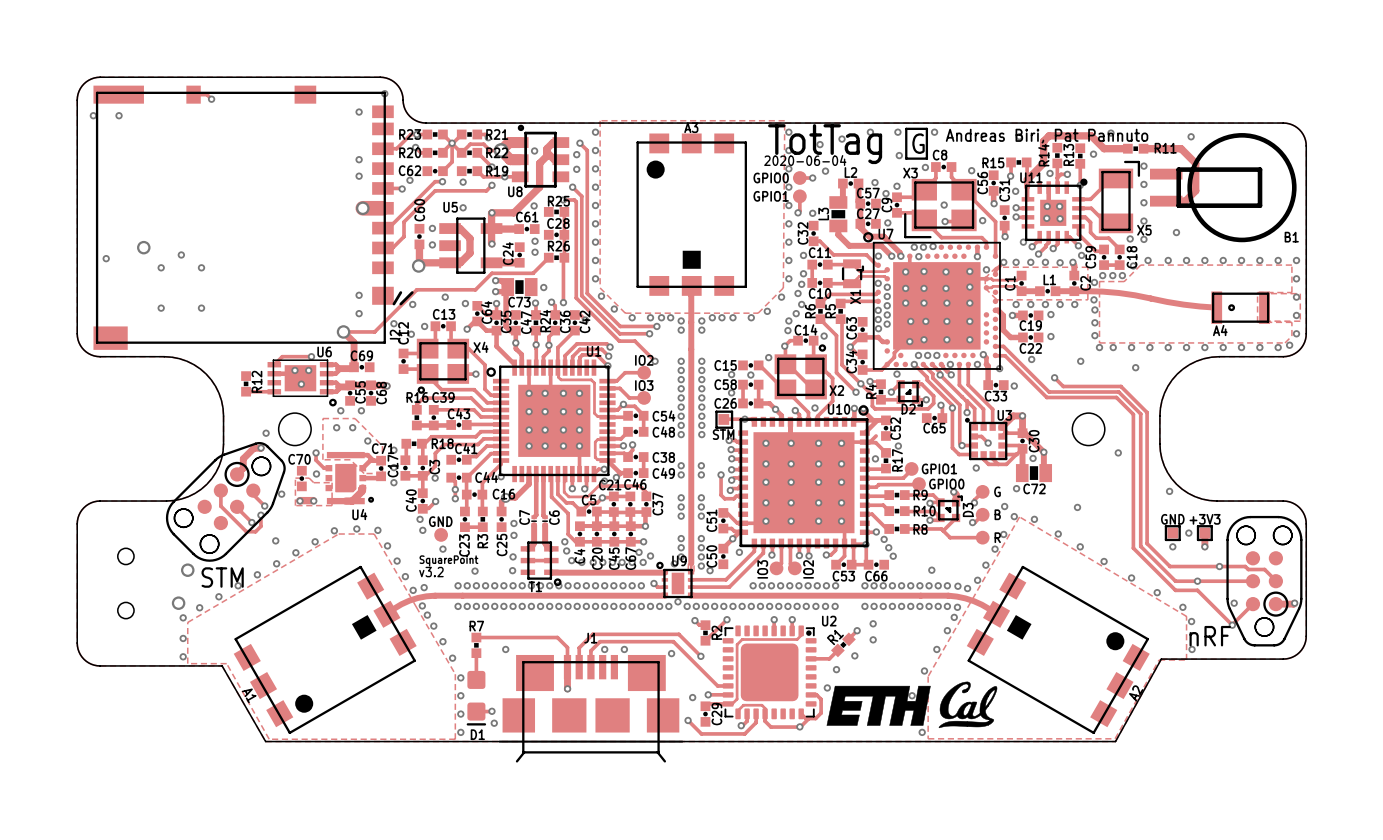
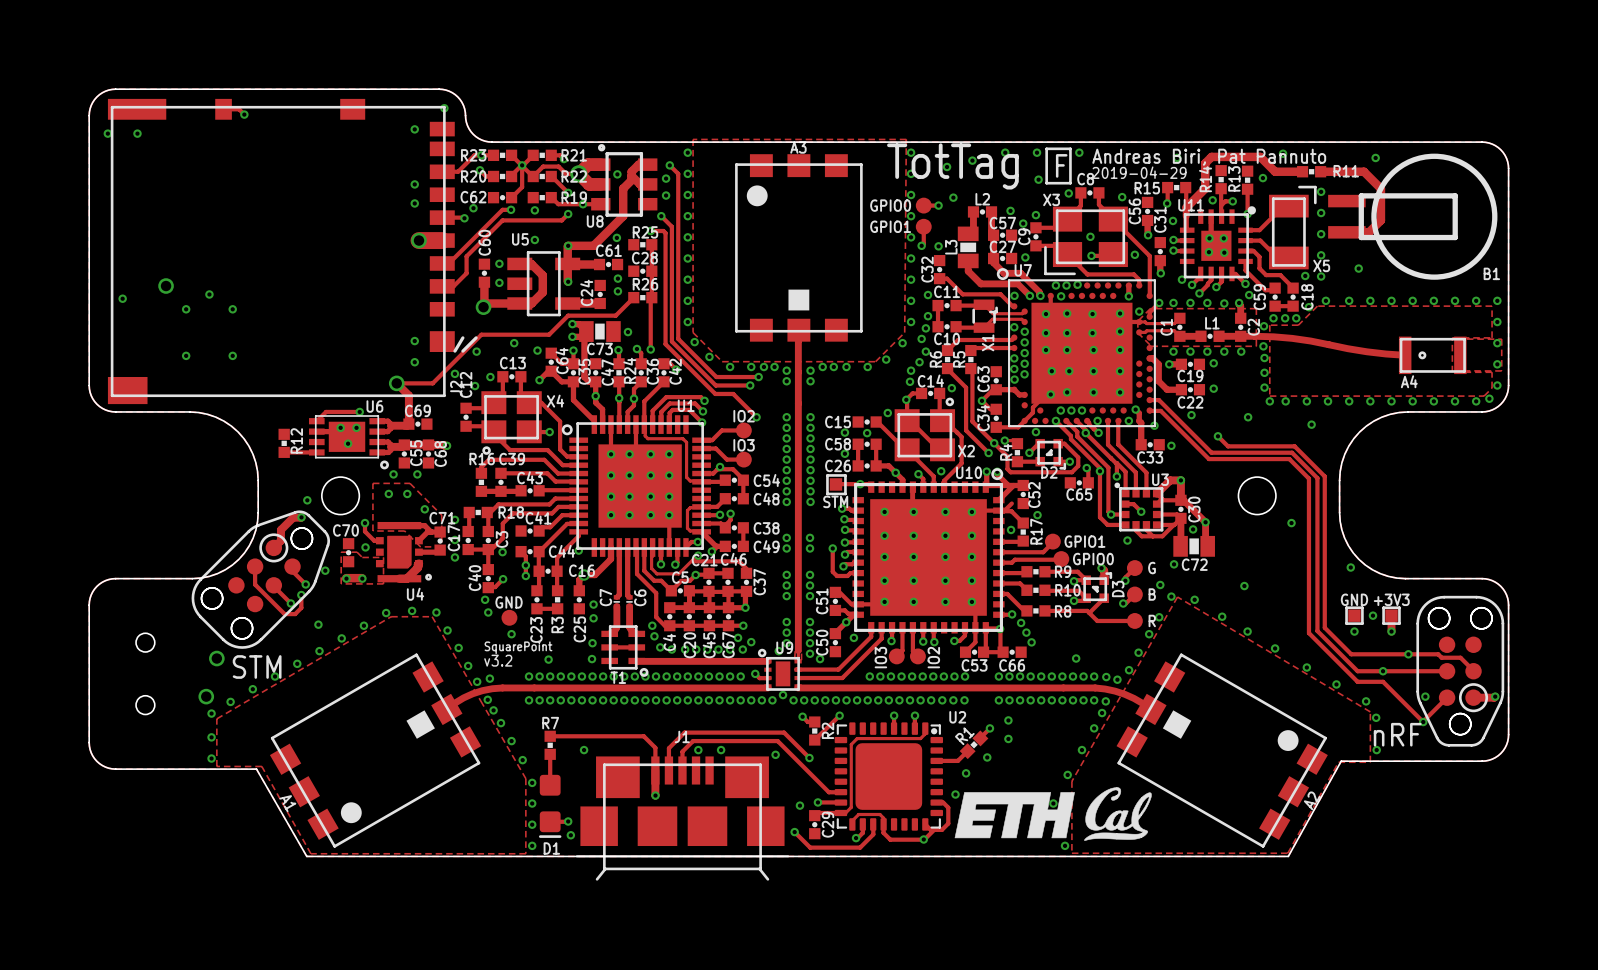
text: G (918, 143) -> F (1061, 165)
text: none -> 2019-04-29 (1139, 172)
text: 2020-06-04 (805, 160) -> none

